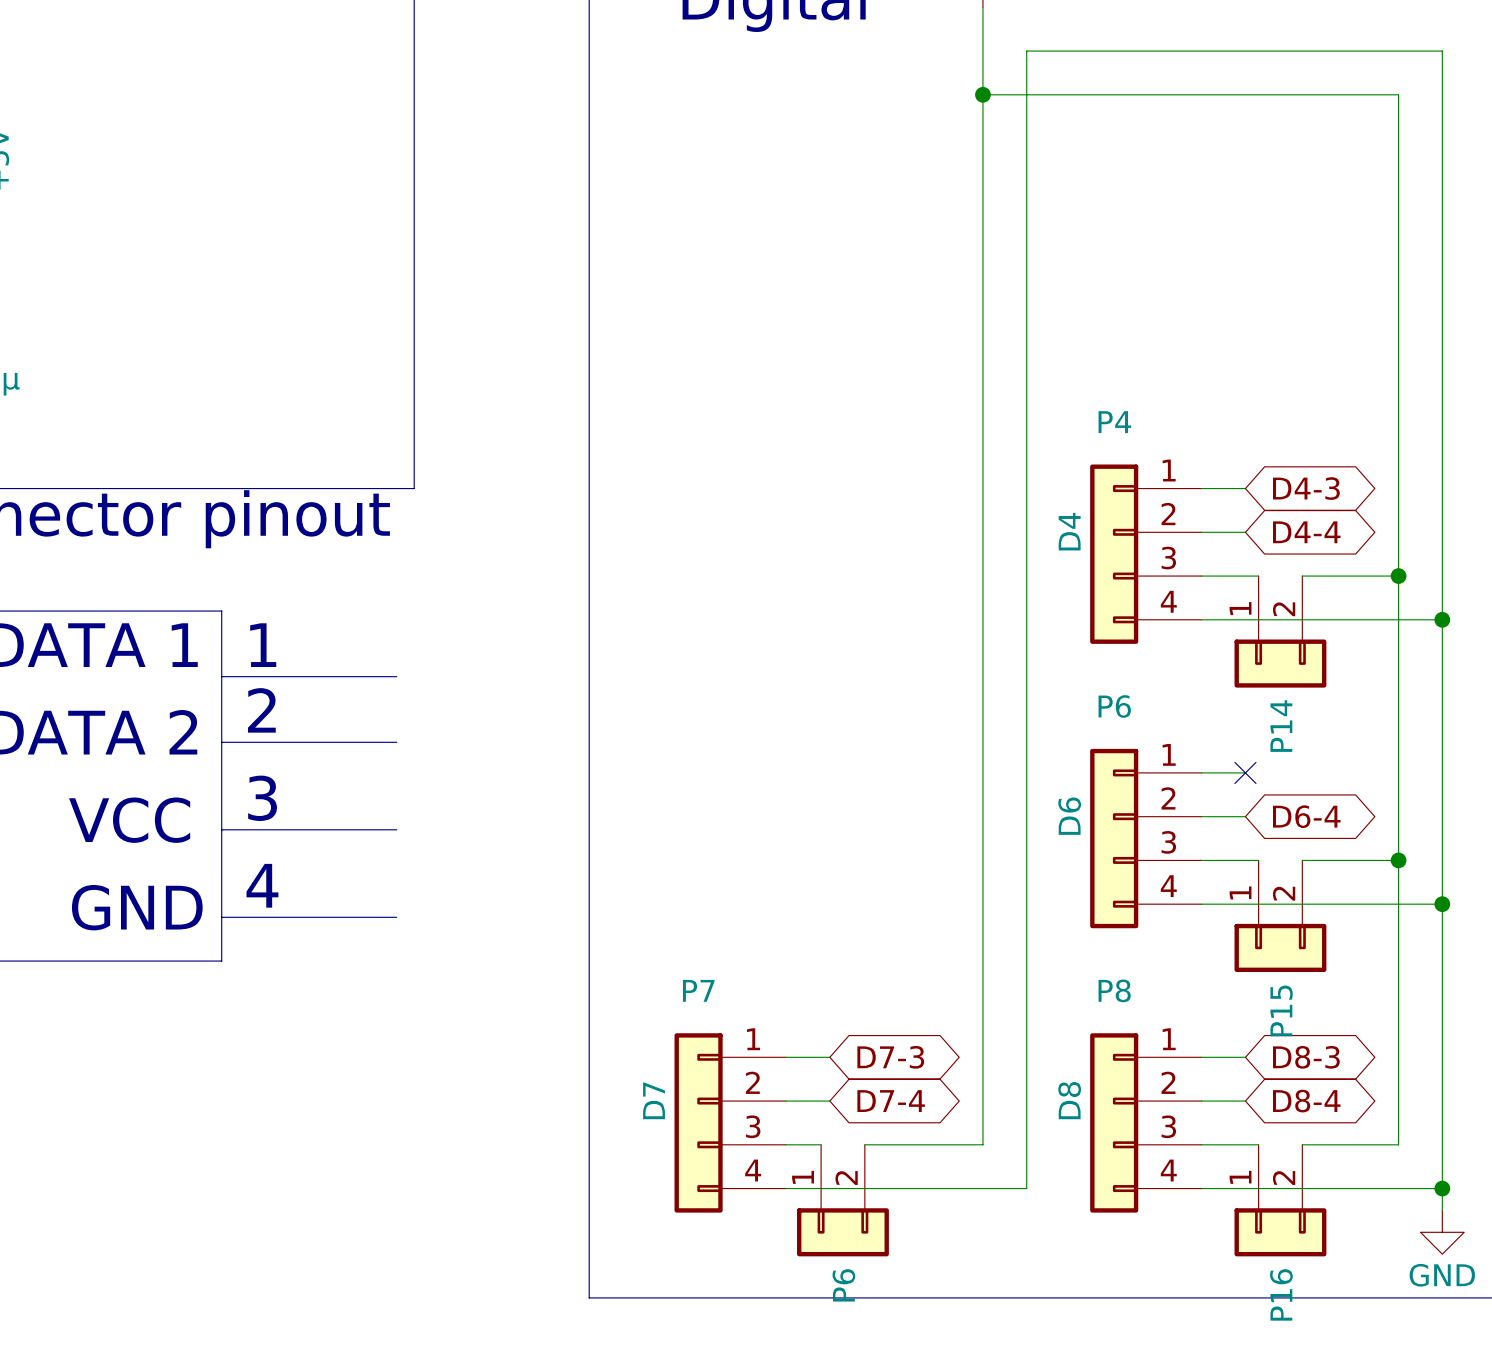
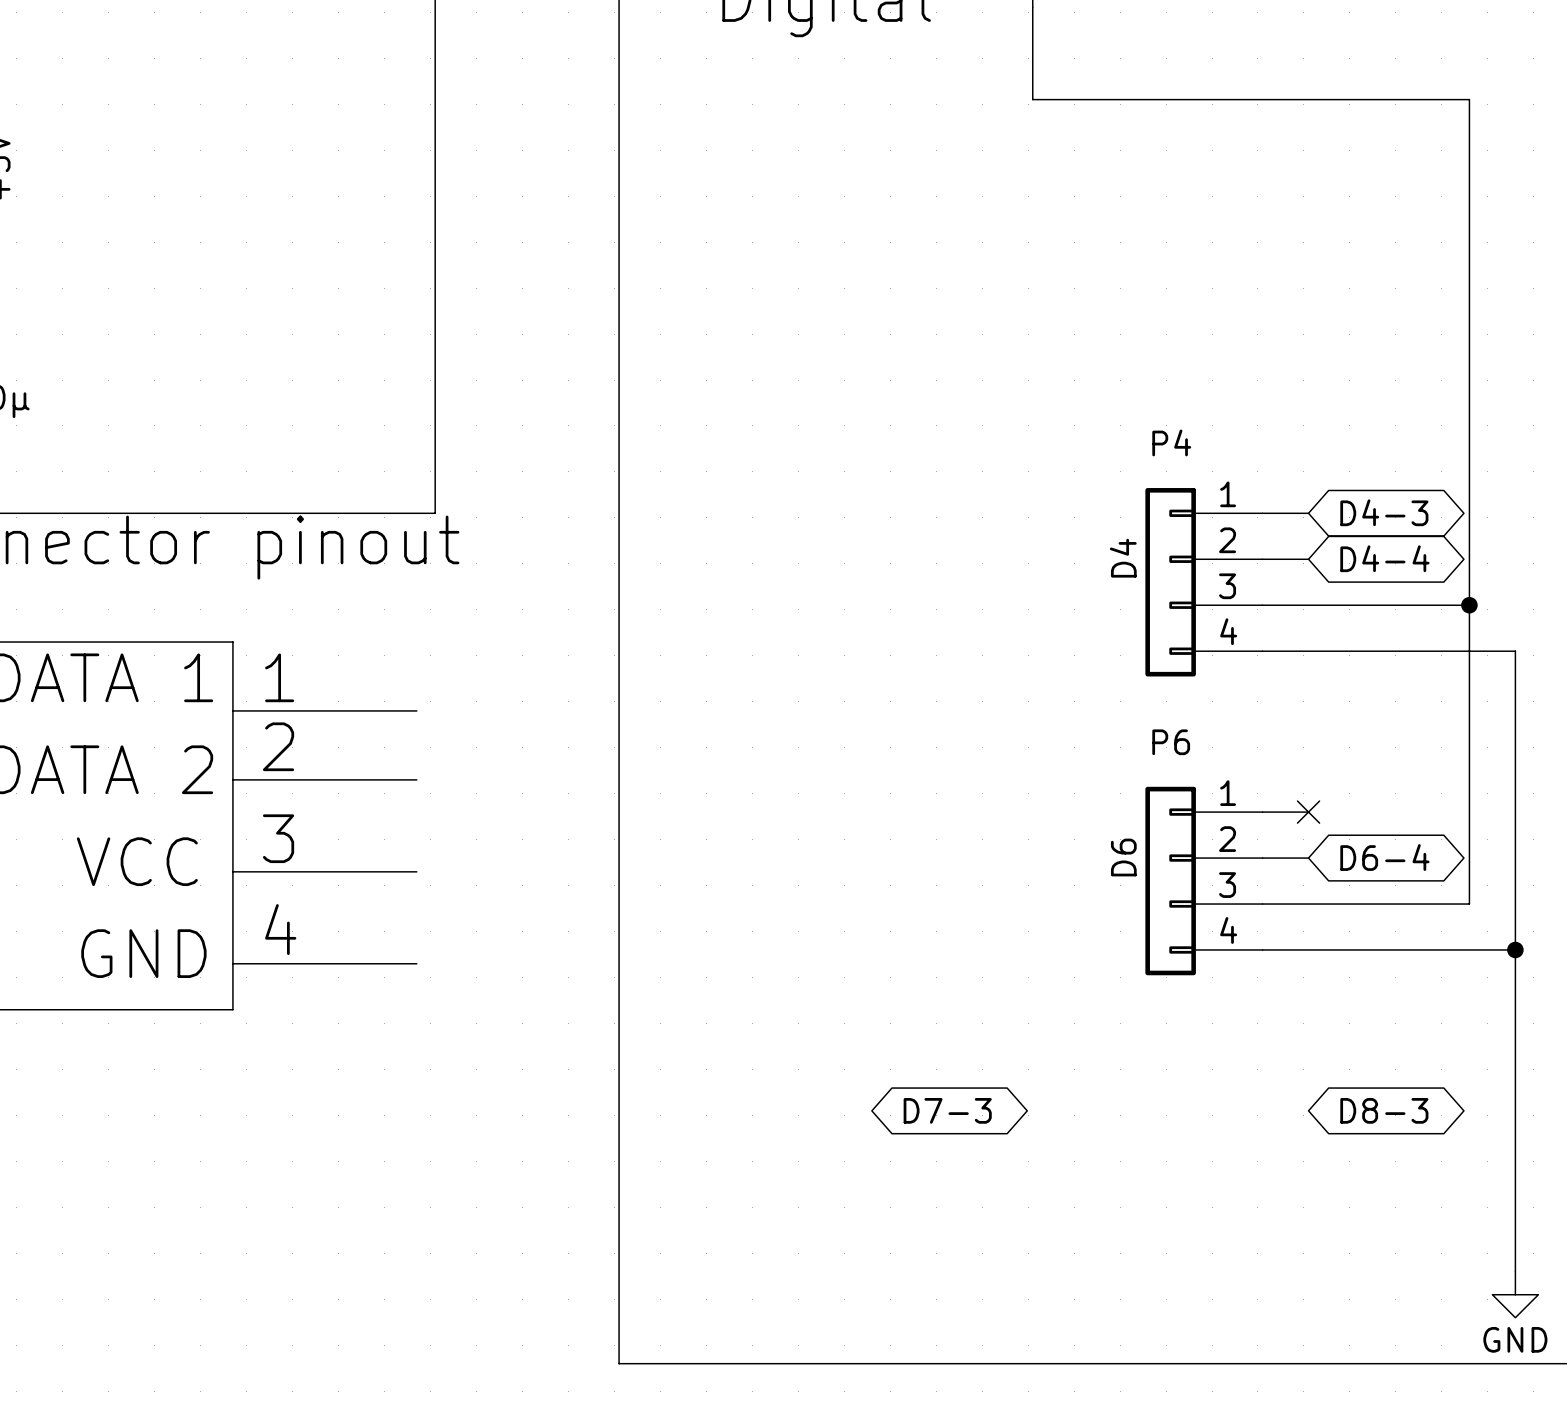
wire: (982, 94) (982, 1144) (864, 1144) -> none
junction: (982, 94) -> none
wire: none -> (1322, 605) (1368, 605)
wire: (1442, 619) (1442, 51) (1026, 51) (1026, 1188) (786, 1188) -> none
junction: (1442, 619) -> none
P14: (1280, 631) -> none
wire: (1398, 860) (1398, 1144) (1302, 1144) -> none
junction: (1398, 860) -> none
P15: (1280, 916) -> none
wire: (786, 1057) (829, 1057) -> none
wire: (1201, 1057) (1245, 1057) -> (1322, 904) (1368, 904)
wire: (786, 1101) (829, 1101) -> none
global label: D7-4 (891, 1101) -> none
wire: (1201, 1101) (1245, 1101) -> none
global label: D8-4 (1306, 1101) -> none
P7: D7 (730, 1122) -> none
P8: D8 (1145, 1122) -> none
wire: (786, 1144) (821, 1144) -> none
wire: (1201, 1144) (1258, 1144) -> none
wire: (1201, 1188) (1442, 1188) -> none
junction: (1442, 1188) -> none
P6: (842, 1200) -> none
P16: (1280, 1200) -> none

